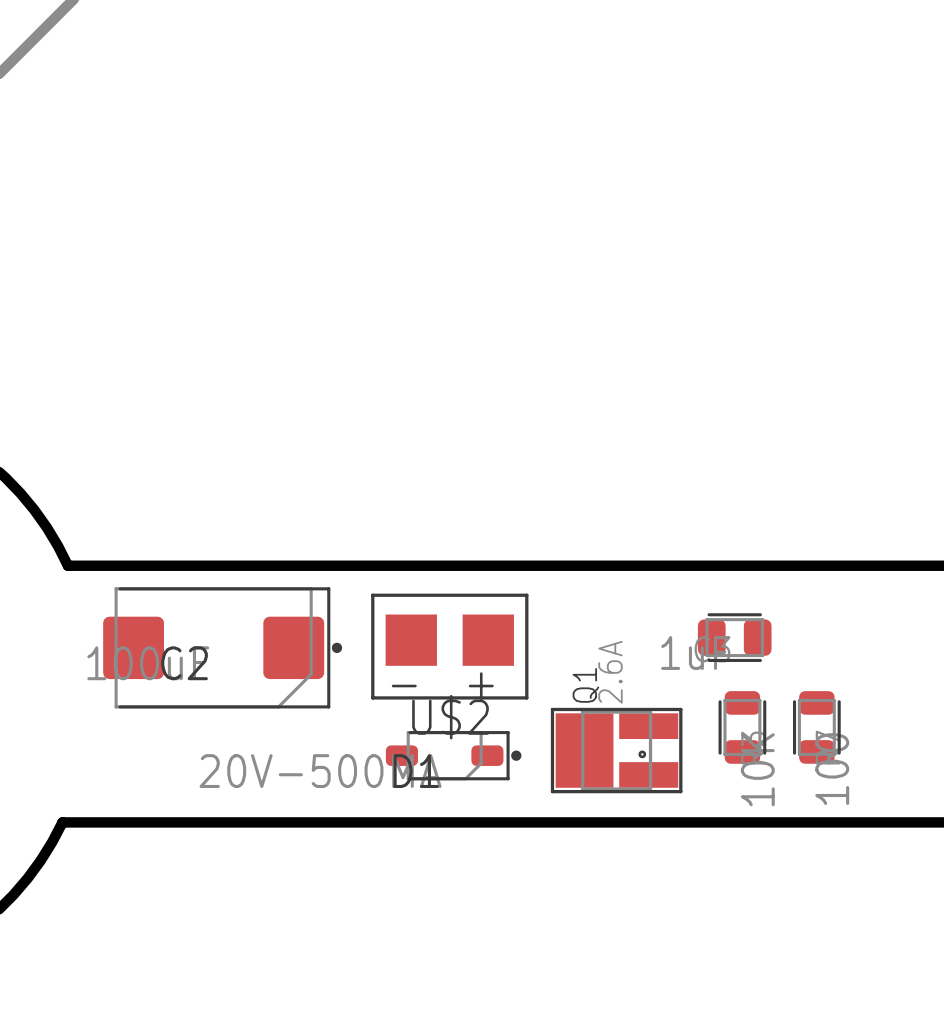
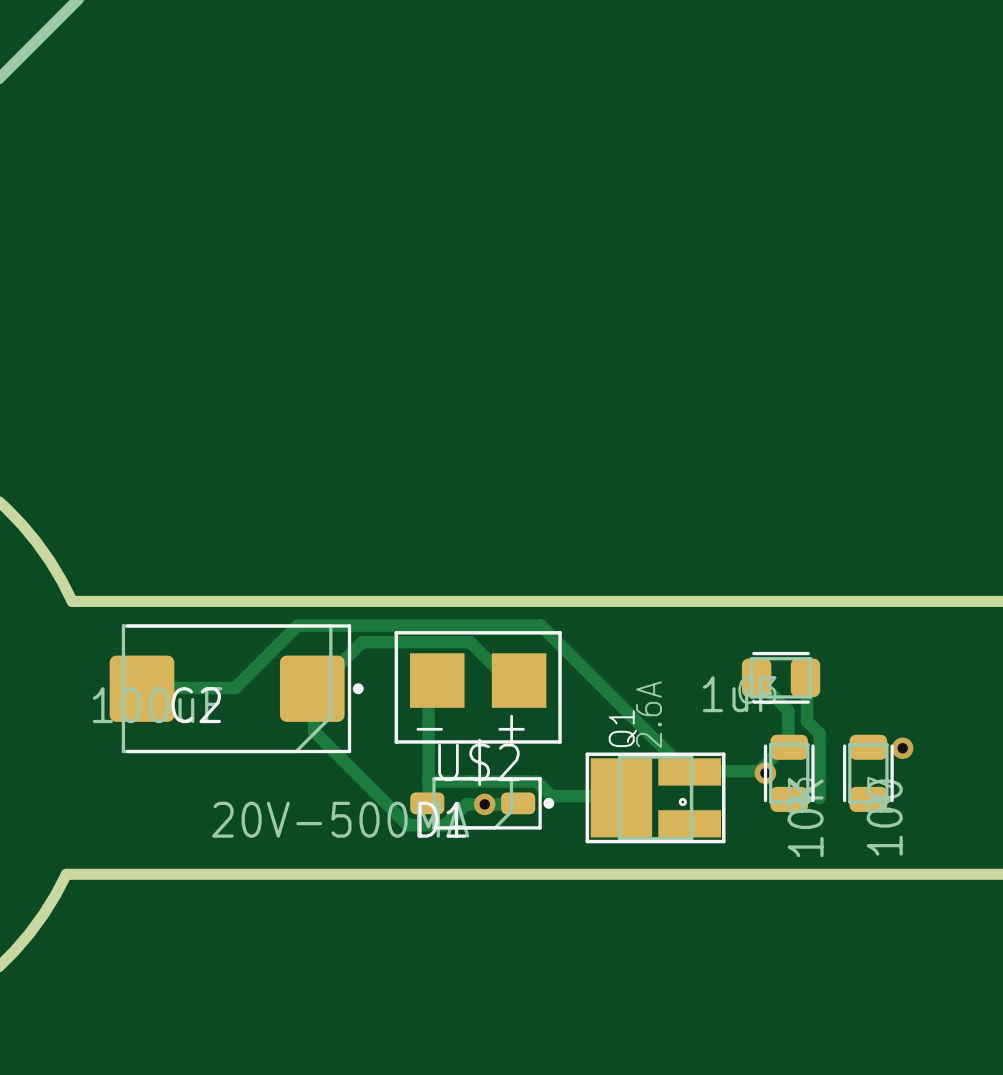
track: none -> (756, 677) (788, 710) (789, 747) (782, 748) (759, 771) (689, 771) (684, 769) (540, 625) (297, 625) (235, 687) (142, 688)
track: none -> (805, 677) (807, 721) (819, 733) (819, 798)
track: none -> (437, 680) (428, 690) (427, 803)
track: none -> (519, 680) (507, 679) (470, 642) (362, 642) (318, 685) (312, 688) (314, 690) (314, 731) (407, 825) (445, 825) (466, 804) (518, 803)
via: none -> (902, 748)
via: none -> (765, 773)
track: none -> (428, 781) (536, 781) (551, 796) (619, 796) (621, 797)
via: none -> (484, 804)

